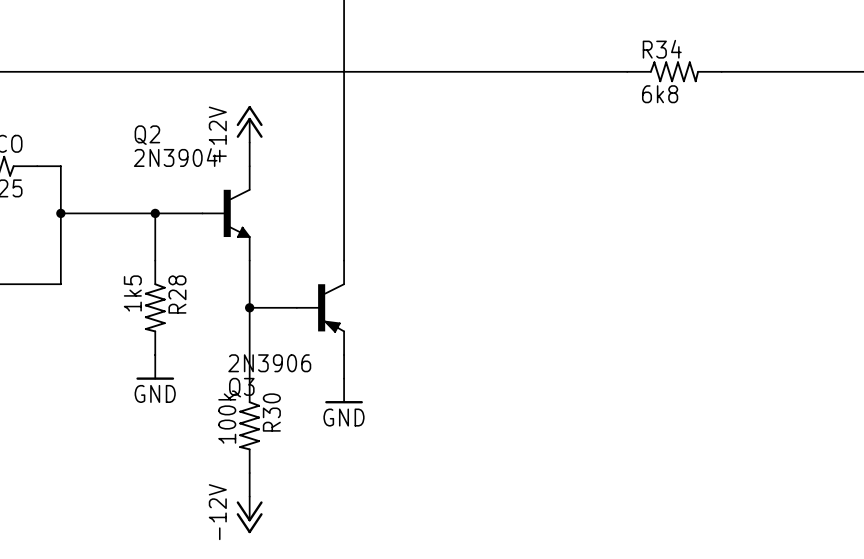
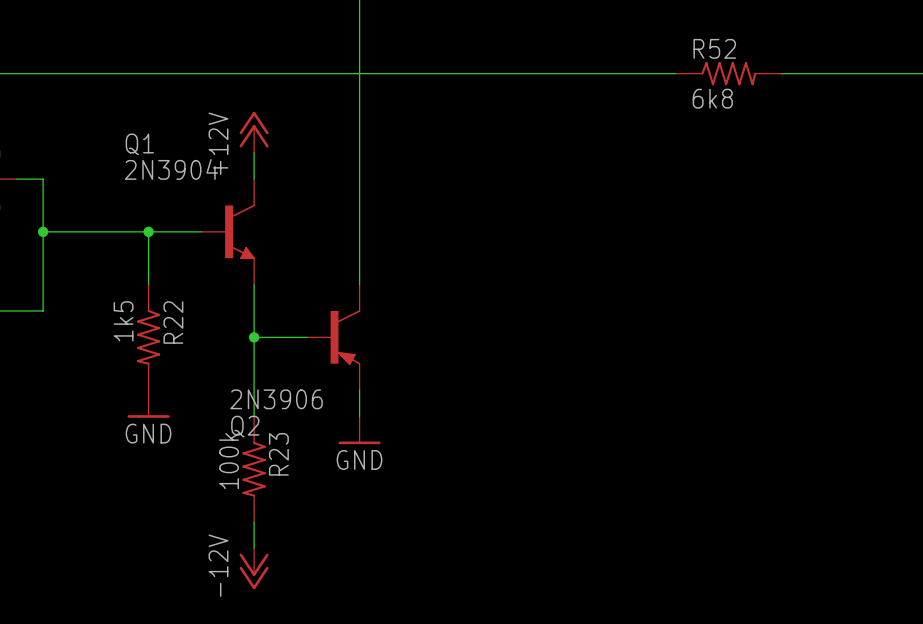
R34 name: R34 (662, 49) -> R52 (714, 48)
Q2 name: Q2 (147, 135) -> Q1 (139, 144)
R28 name: R28 (177, 294) -> R22 (173, 322)
Q3 name: Q3 (241, 387) -> Q2 (245, 426)
R30 name: R30 (271, 412) -> R23 (278, 454)

